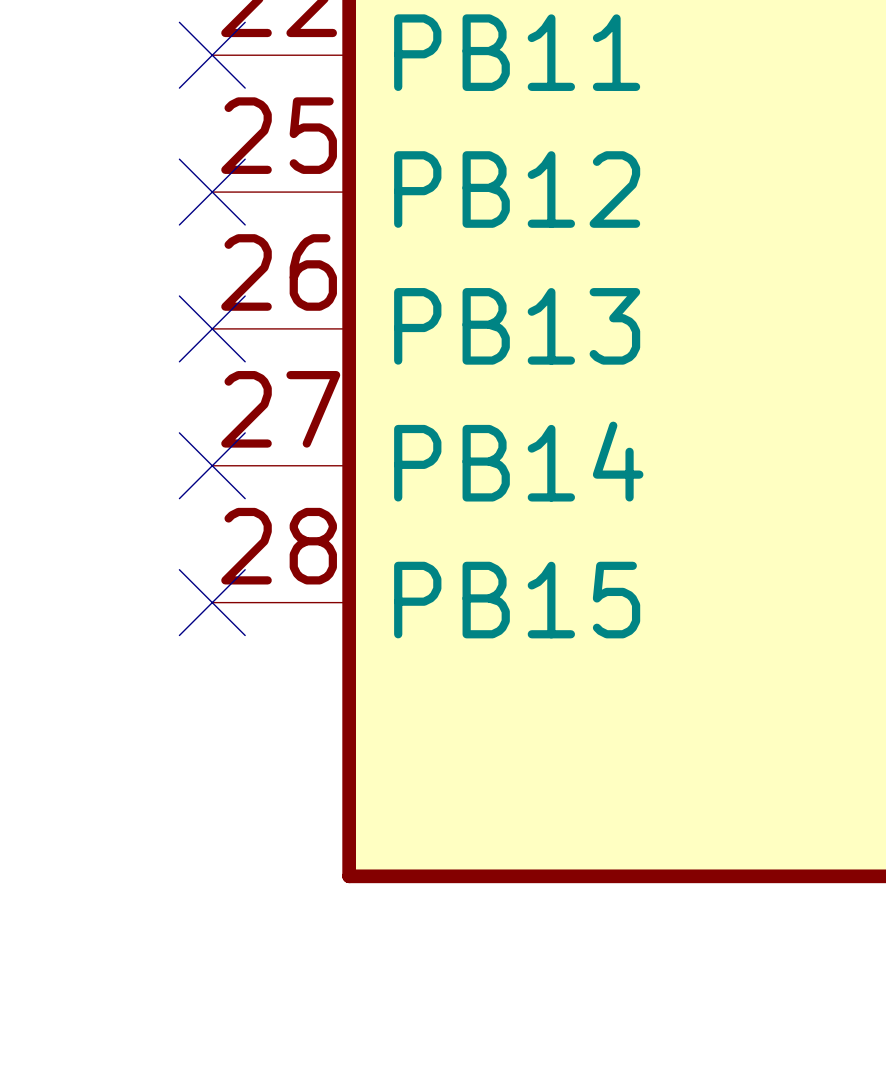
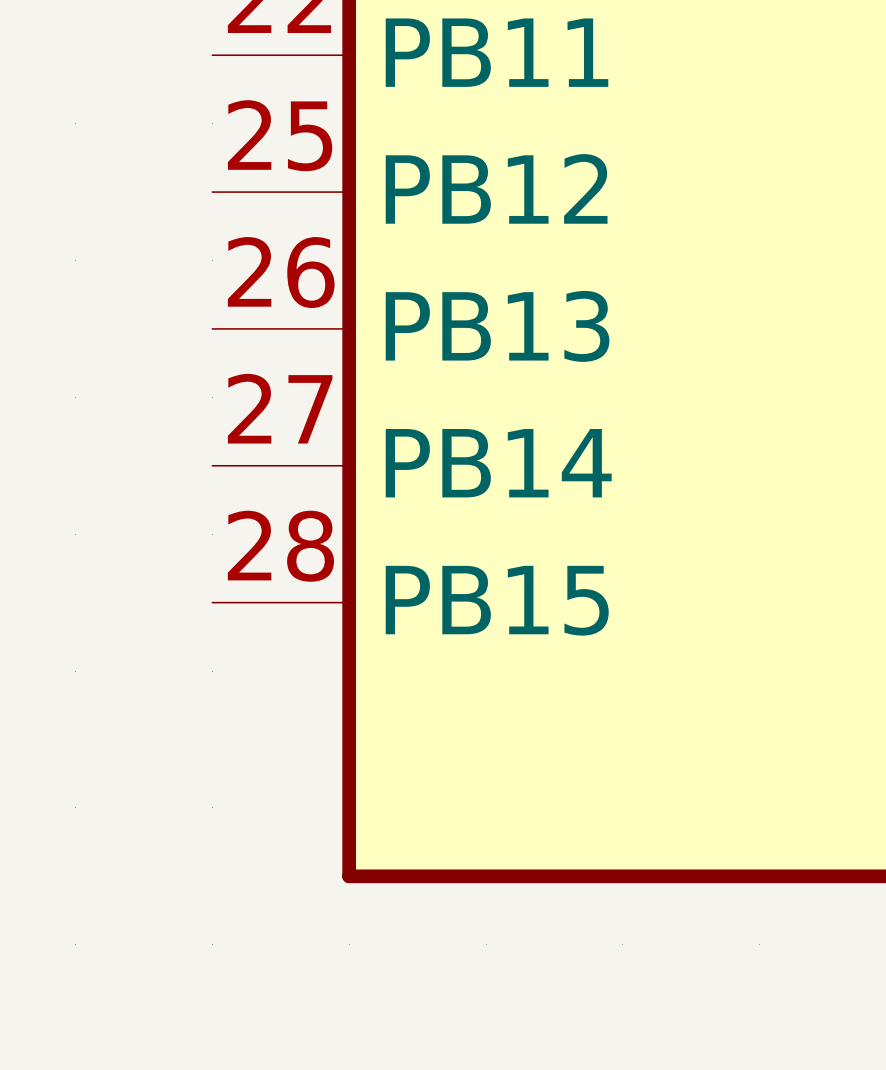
no-connect mark: (212, 55) -> none
no-connect mark: (212, 192) -> none
no-connect mark: (212, 328) -> none
no-connect mark: (212, 465) -> none
no-connect mark: (212, 602) -> none

